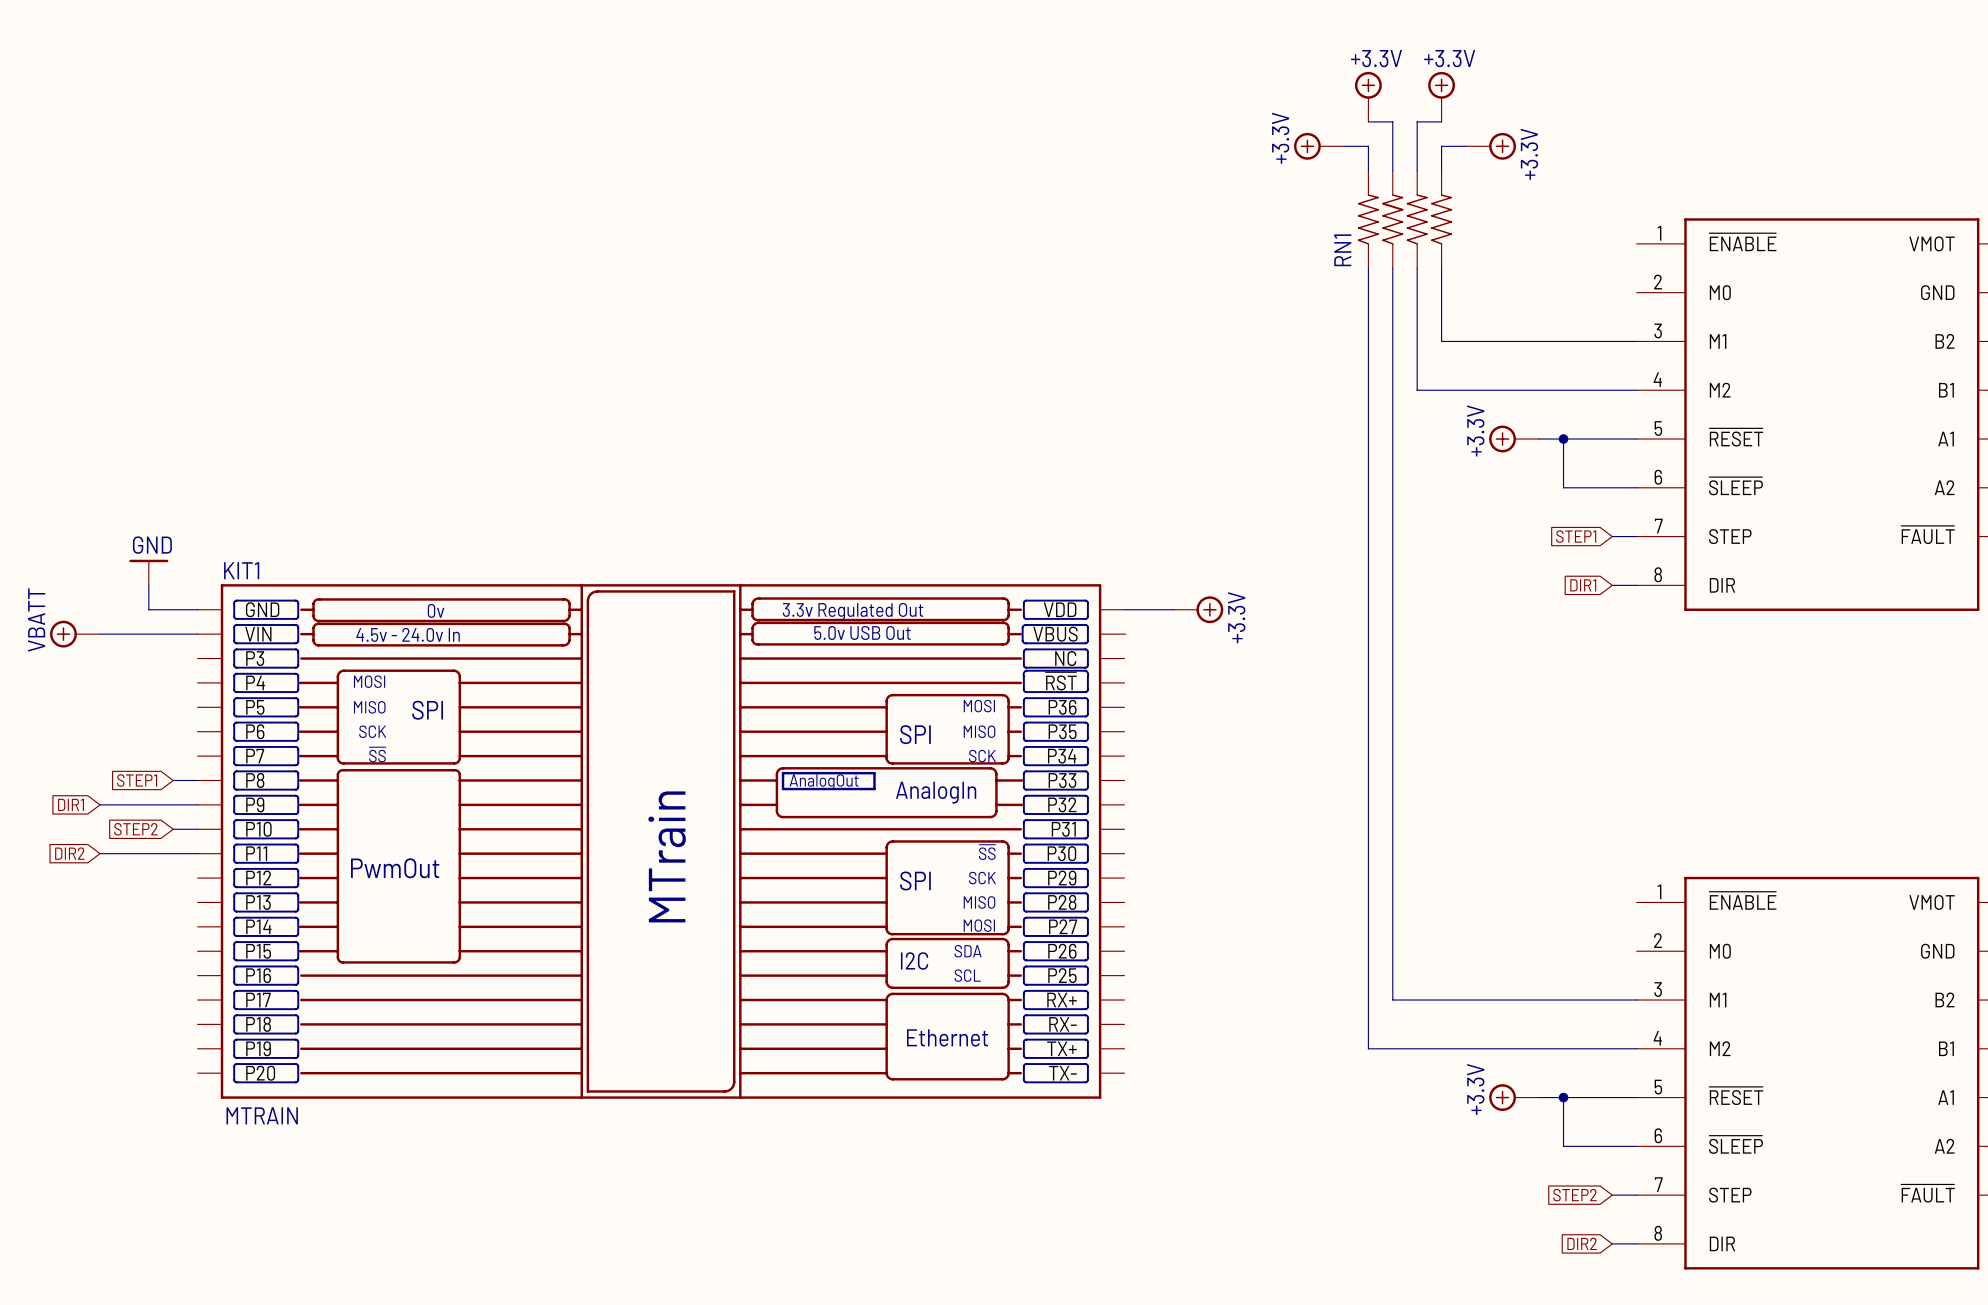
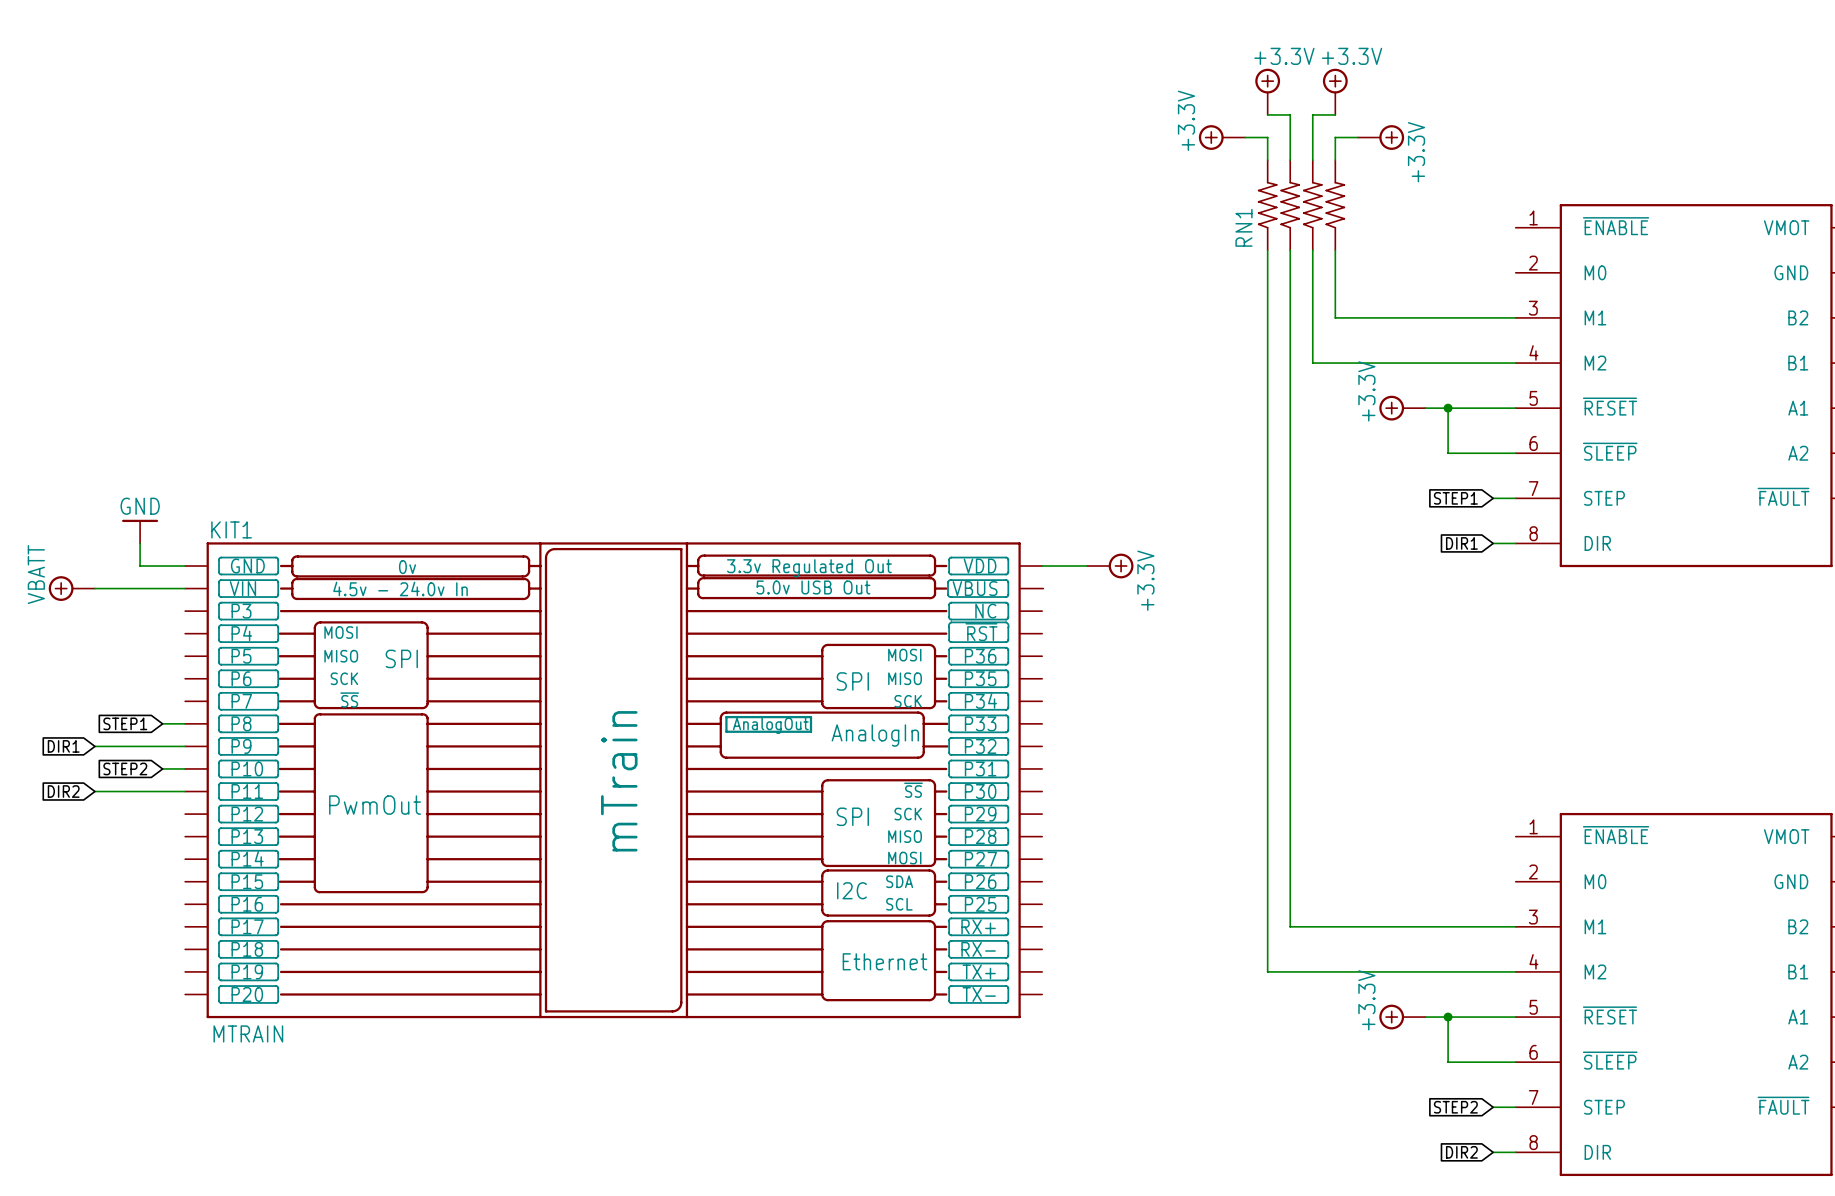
KIT1 text: MTrain (667, 856) -> mTrain (619, 781)

